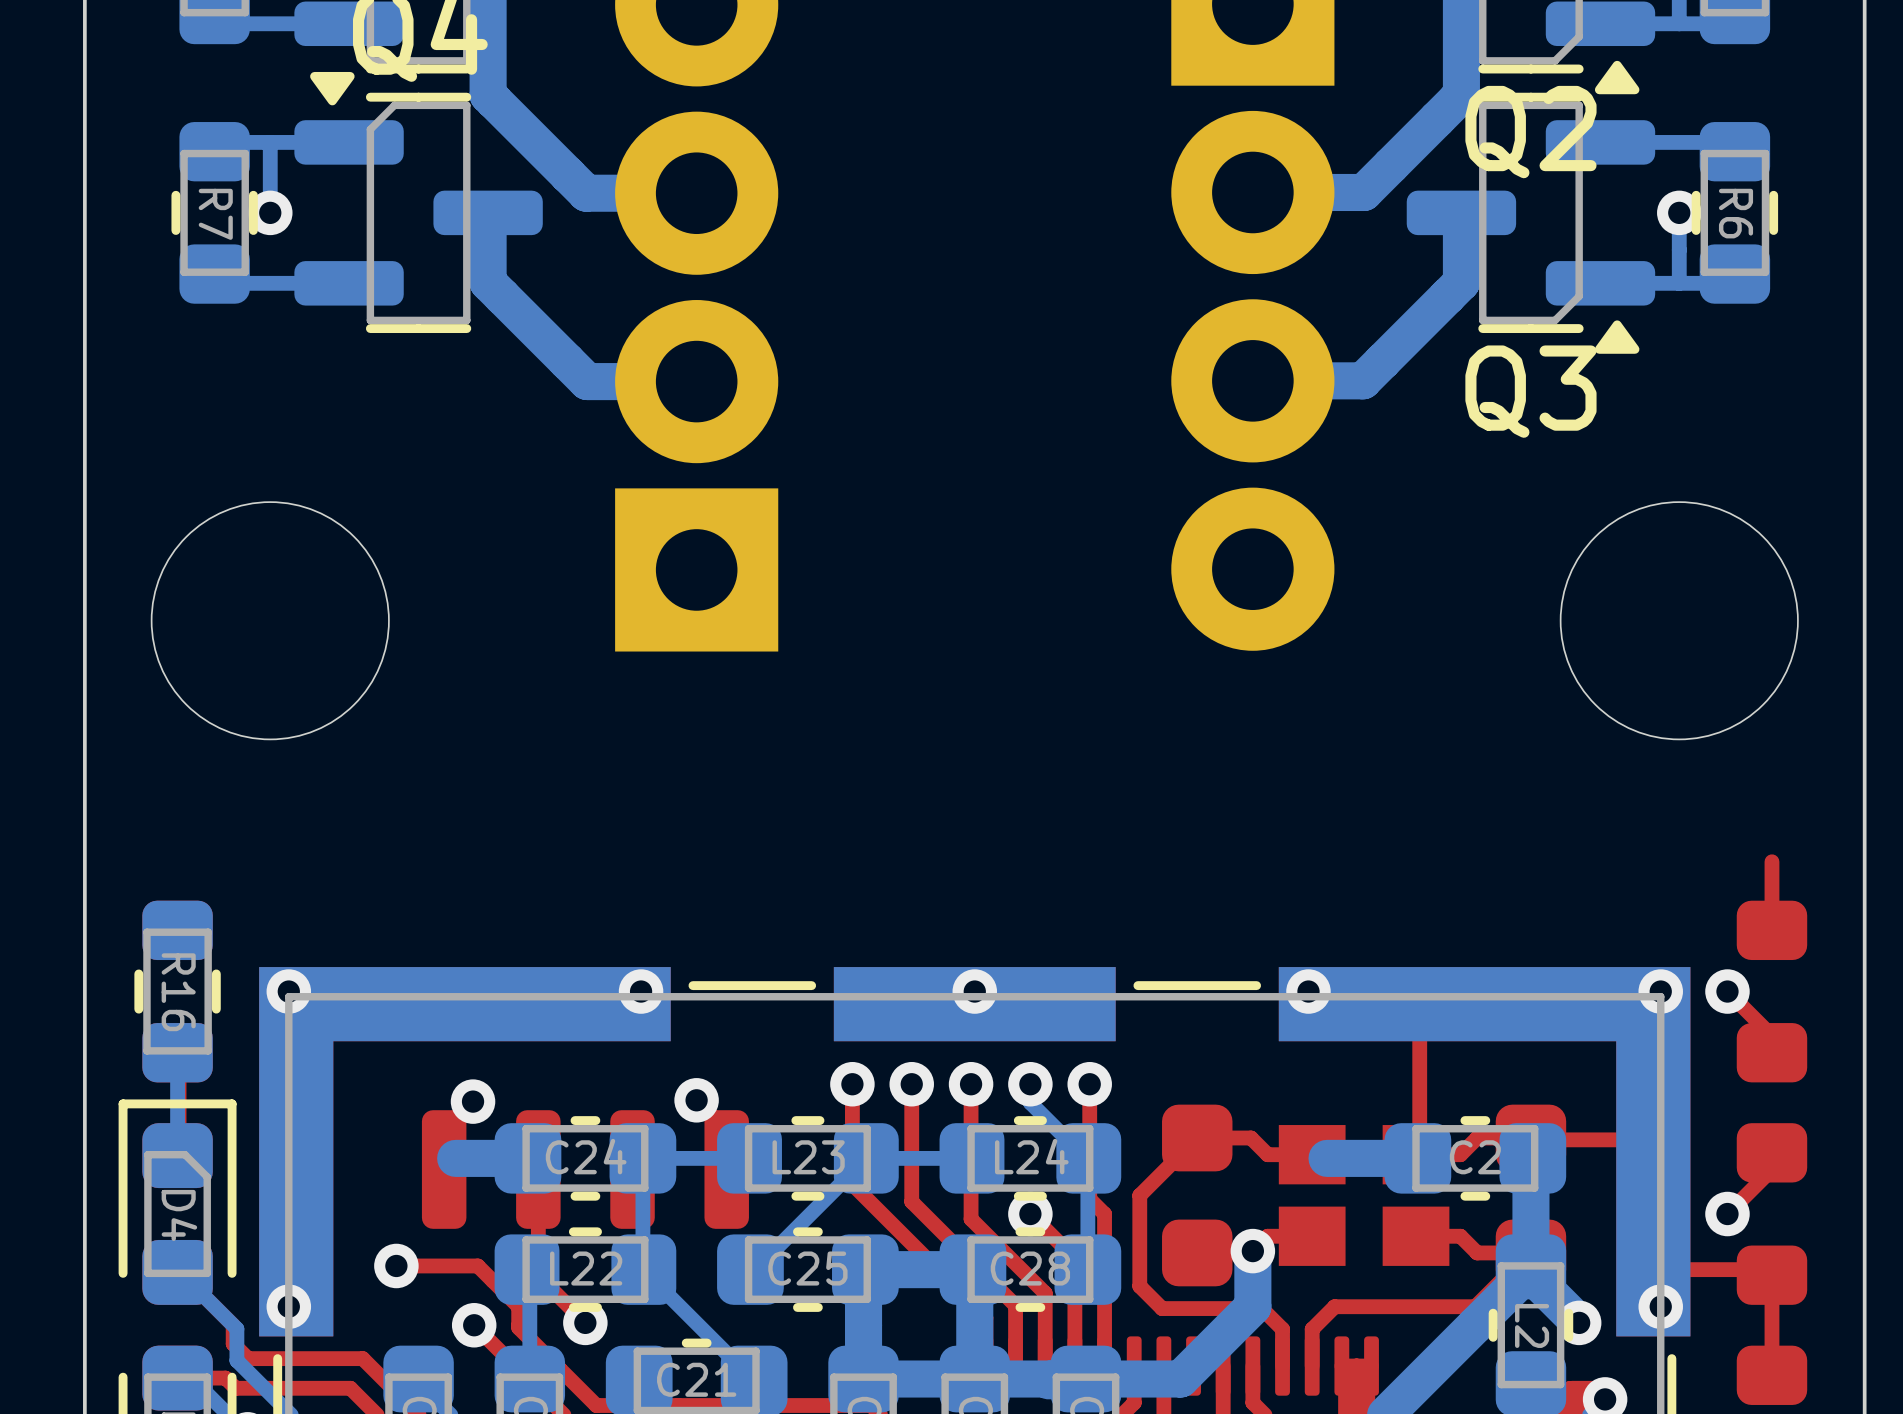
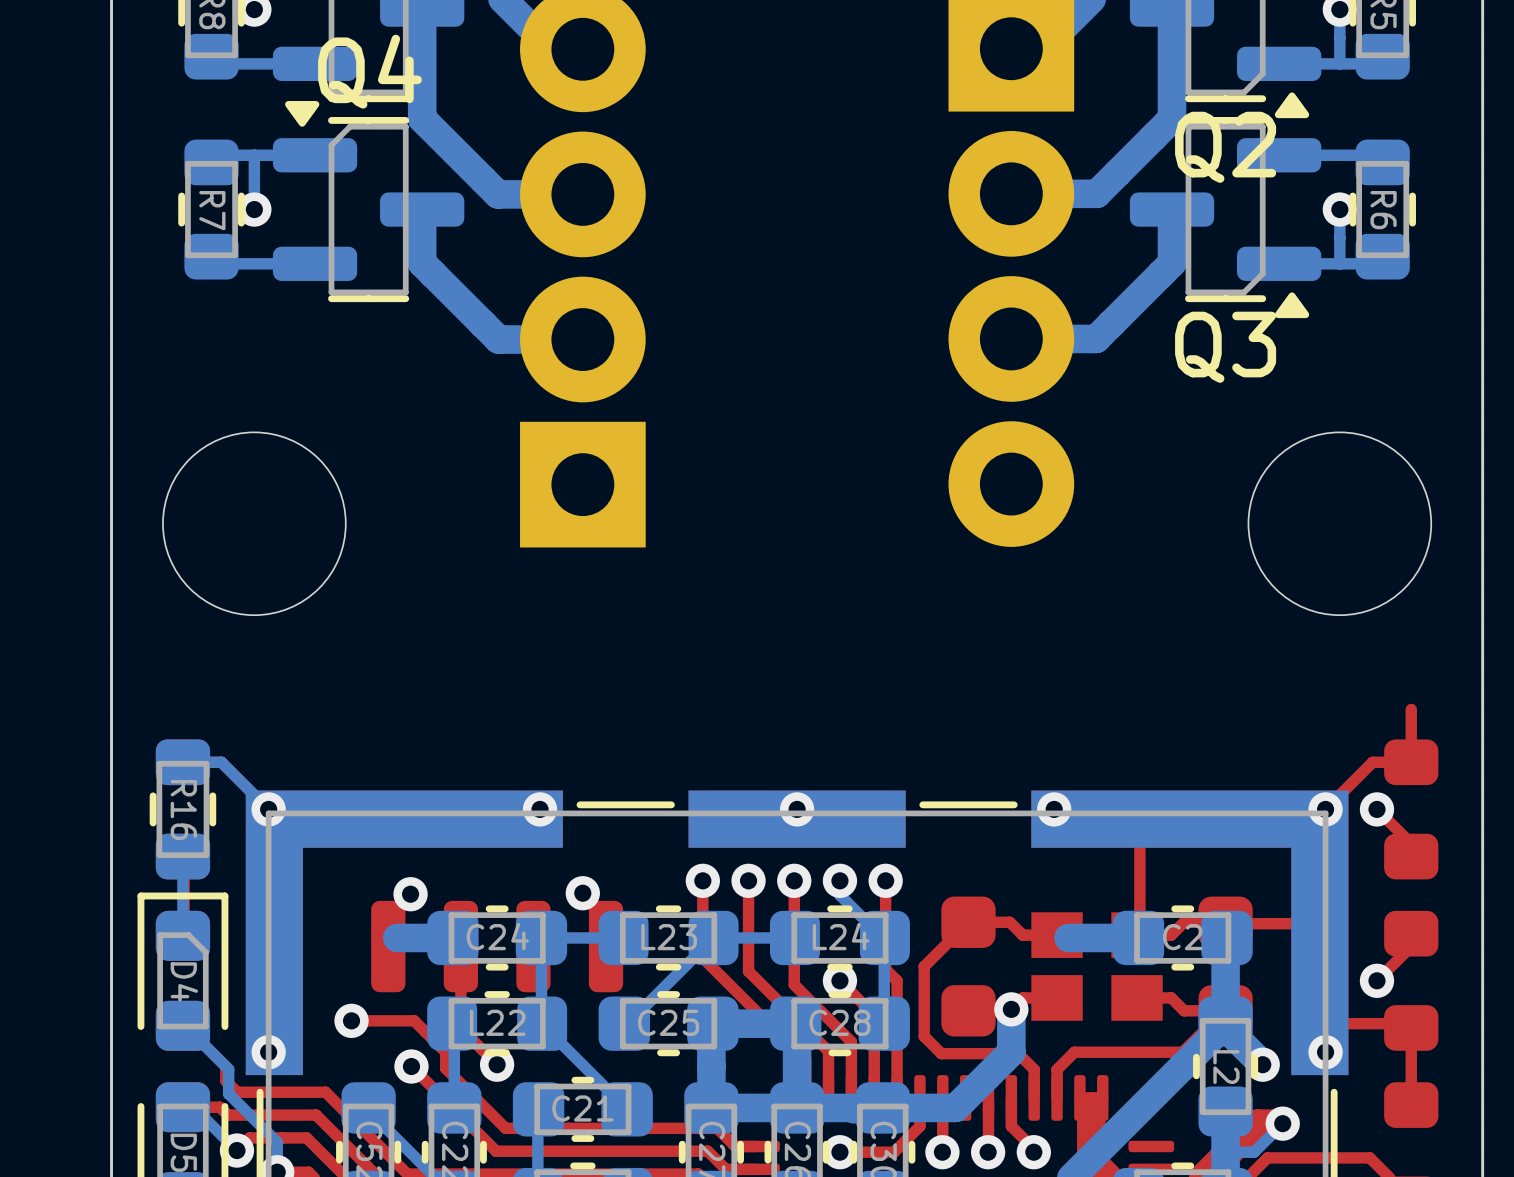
bottom track: none -> (182, 762) (221, 762) (268, 809)
top track: none -> (1411, 762) (1372, 762) (1325, 809)

